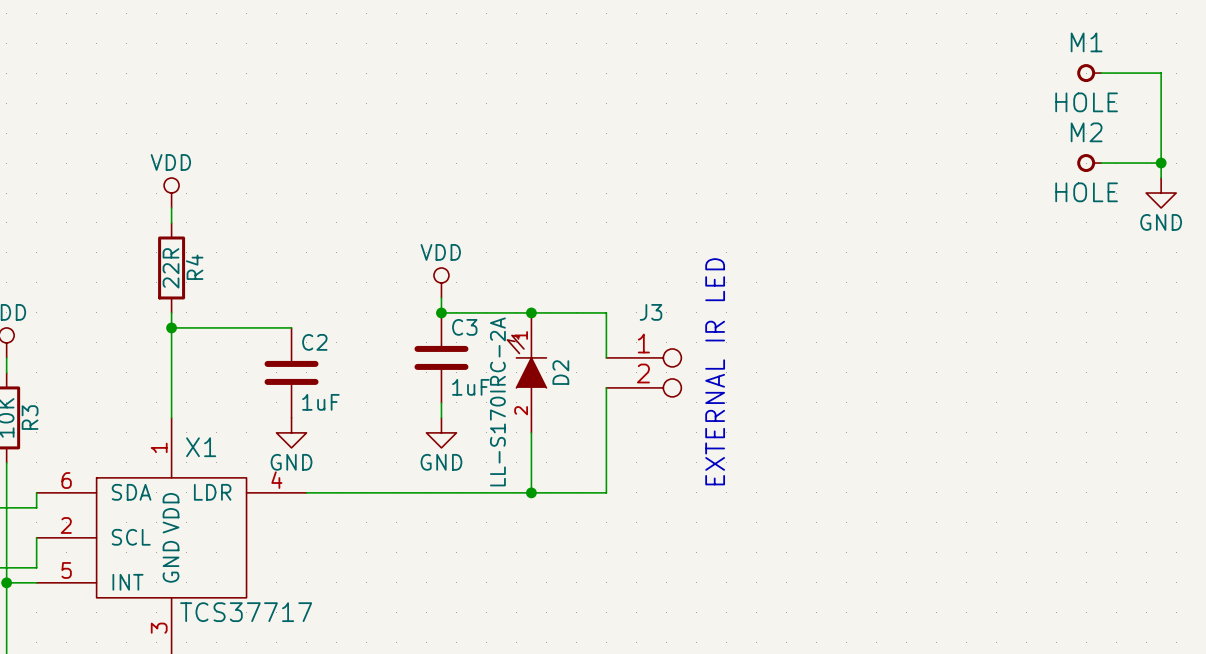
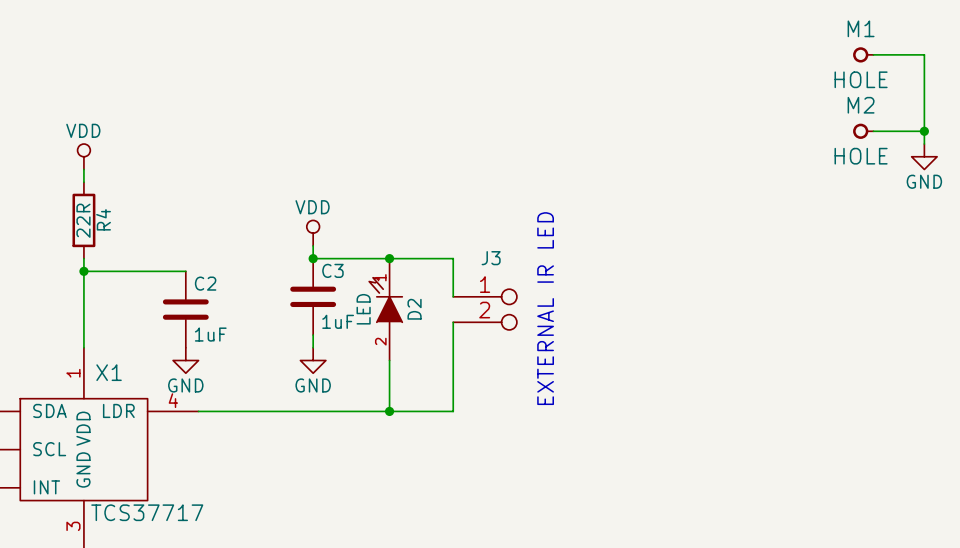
D2 value: LL-S170IRC-2A (497, 401) -> LED (363, 309)

